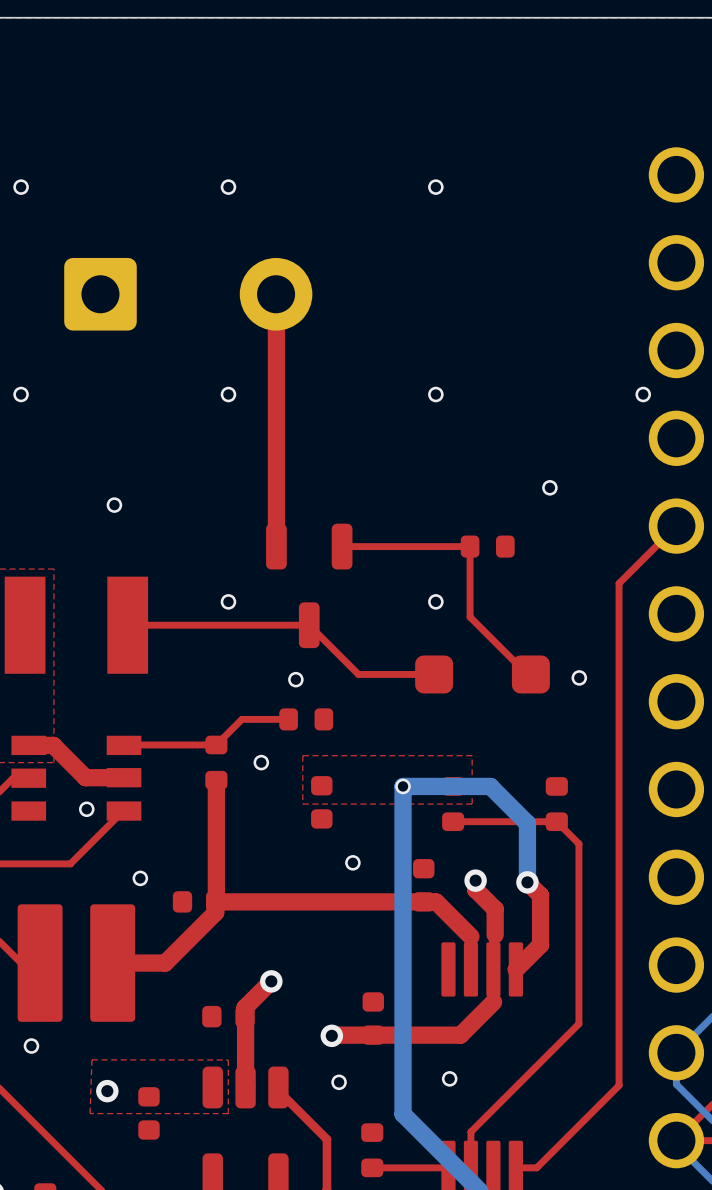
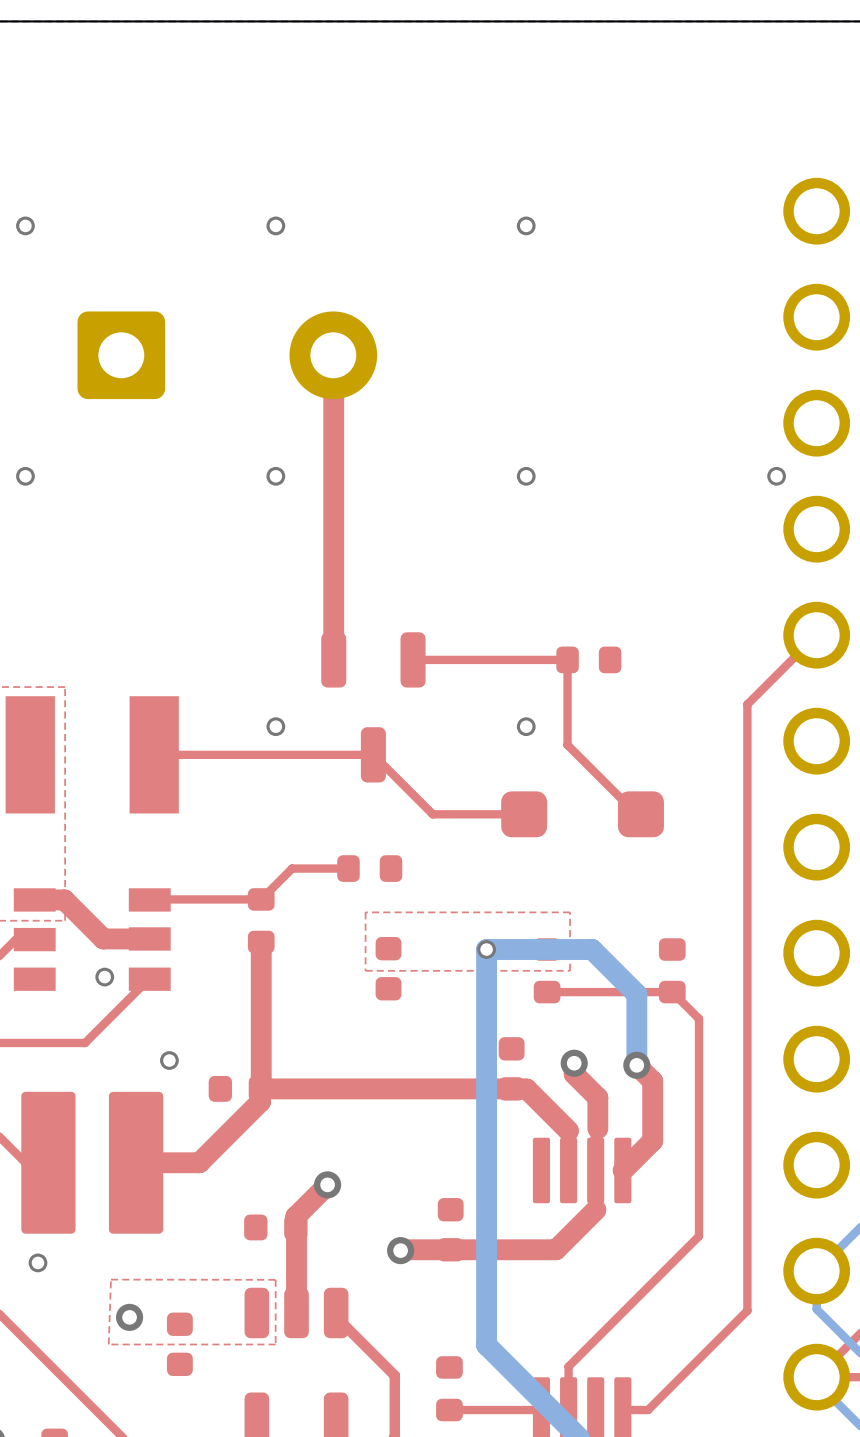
via: (549, 487) -> none
via: (114, 505) -> none
via: (579, 677) -> none
via: (295, 679) -> none
via: (261, 762) -> none
via: (352, 862) -> none
via: (449, 1078) -> none
via: (339, 1082) -> none

